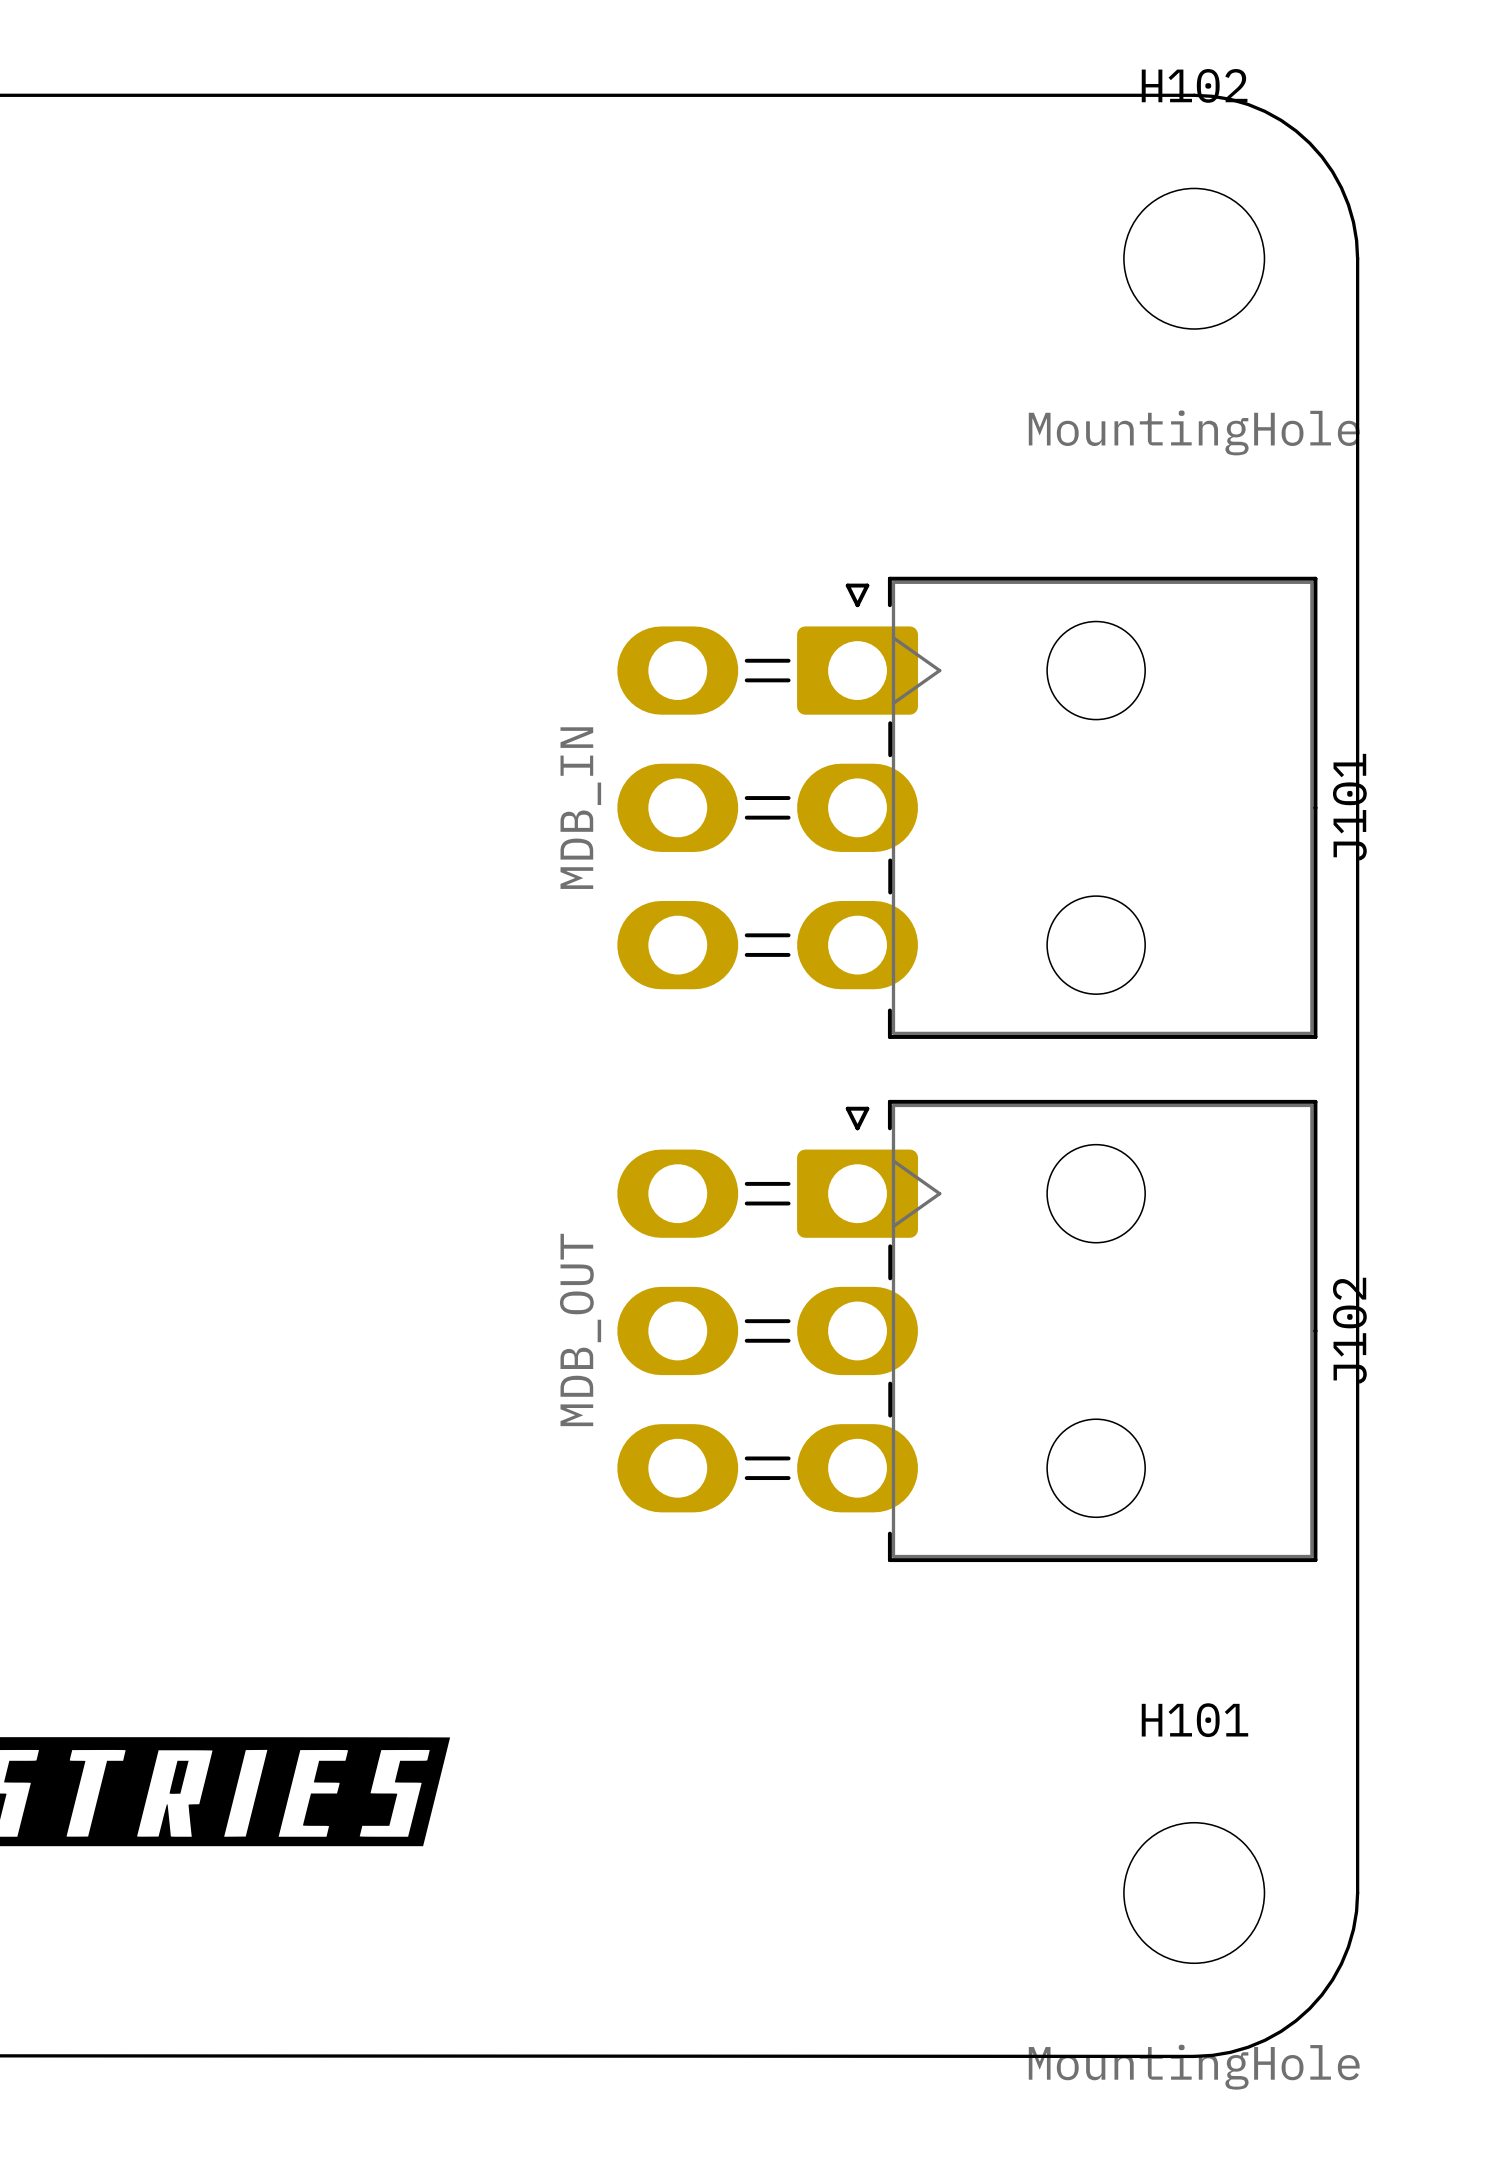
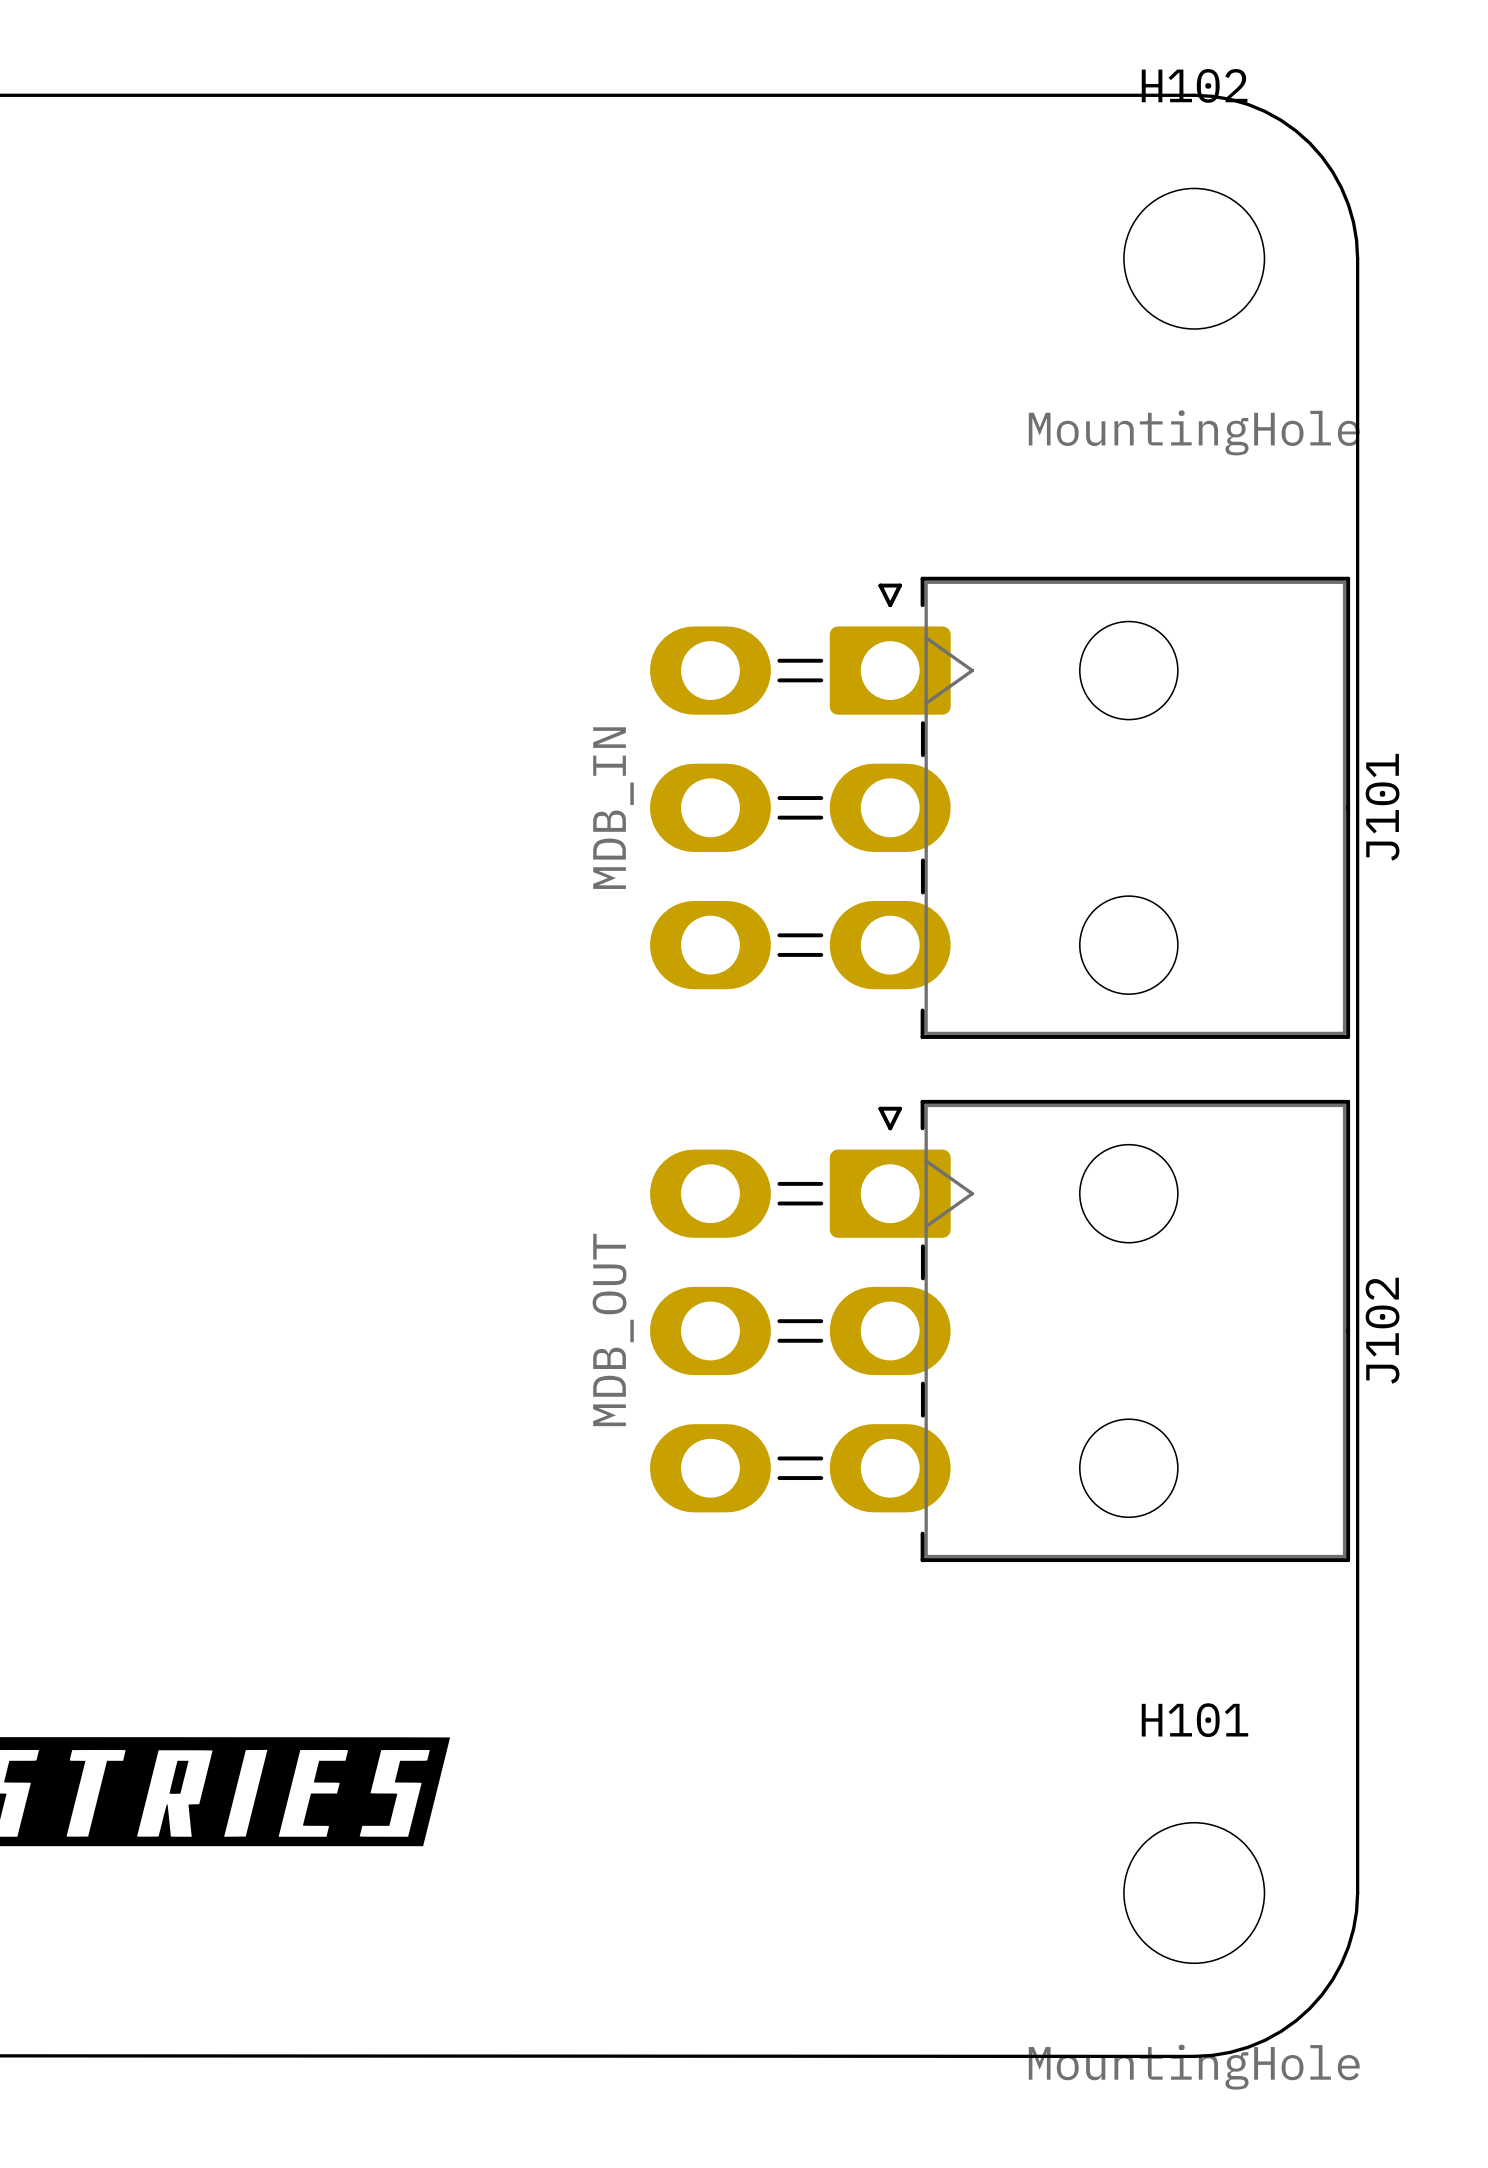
J101 position: (967, 807) -> (1000, 807)
J102 position: (967, 1330) -> (1000, 1330)

